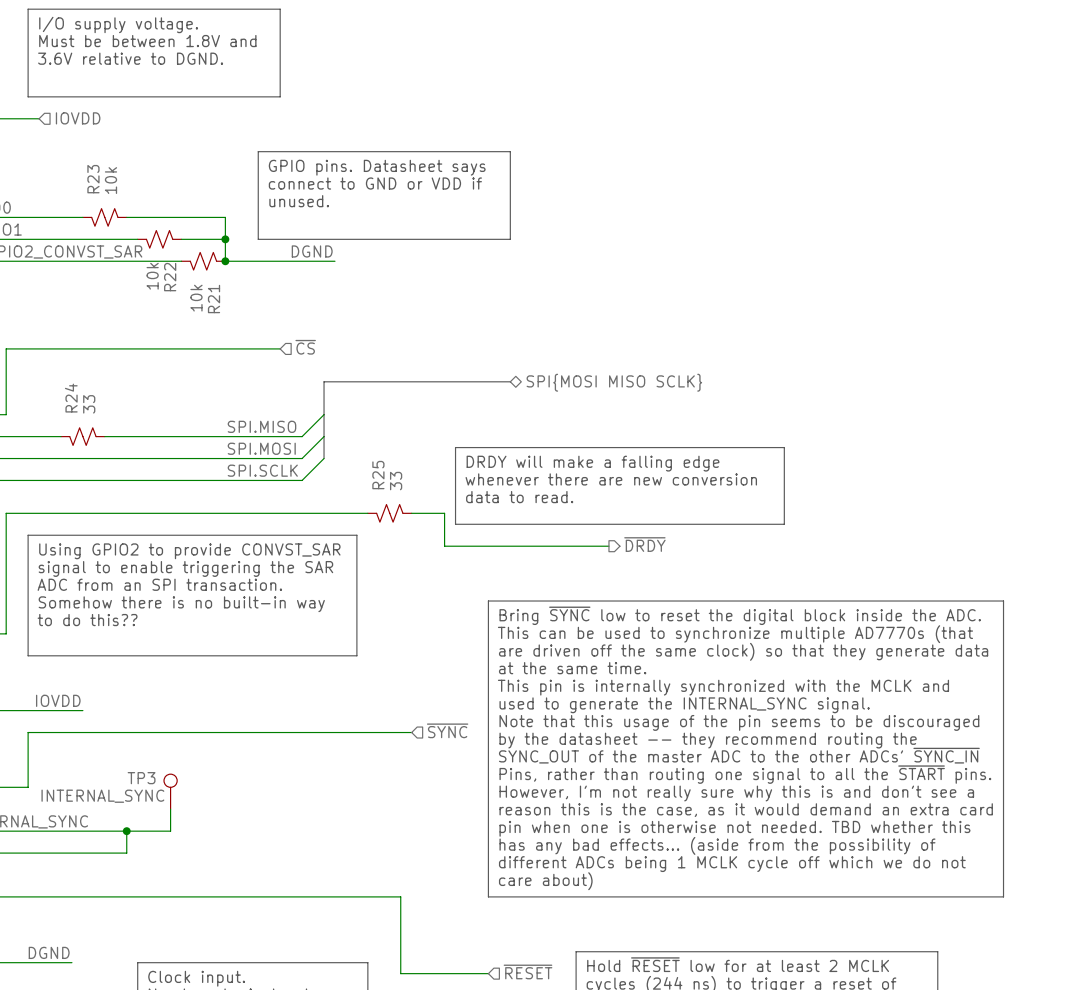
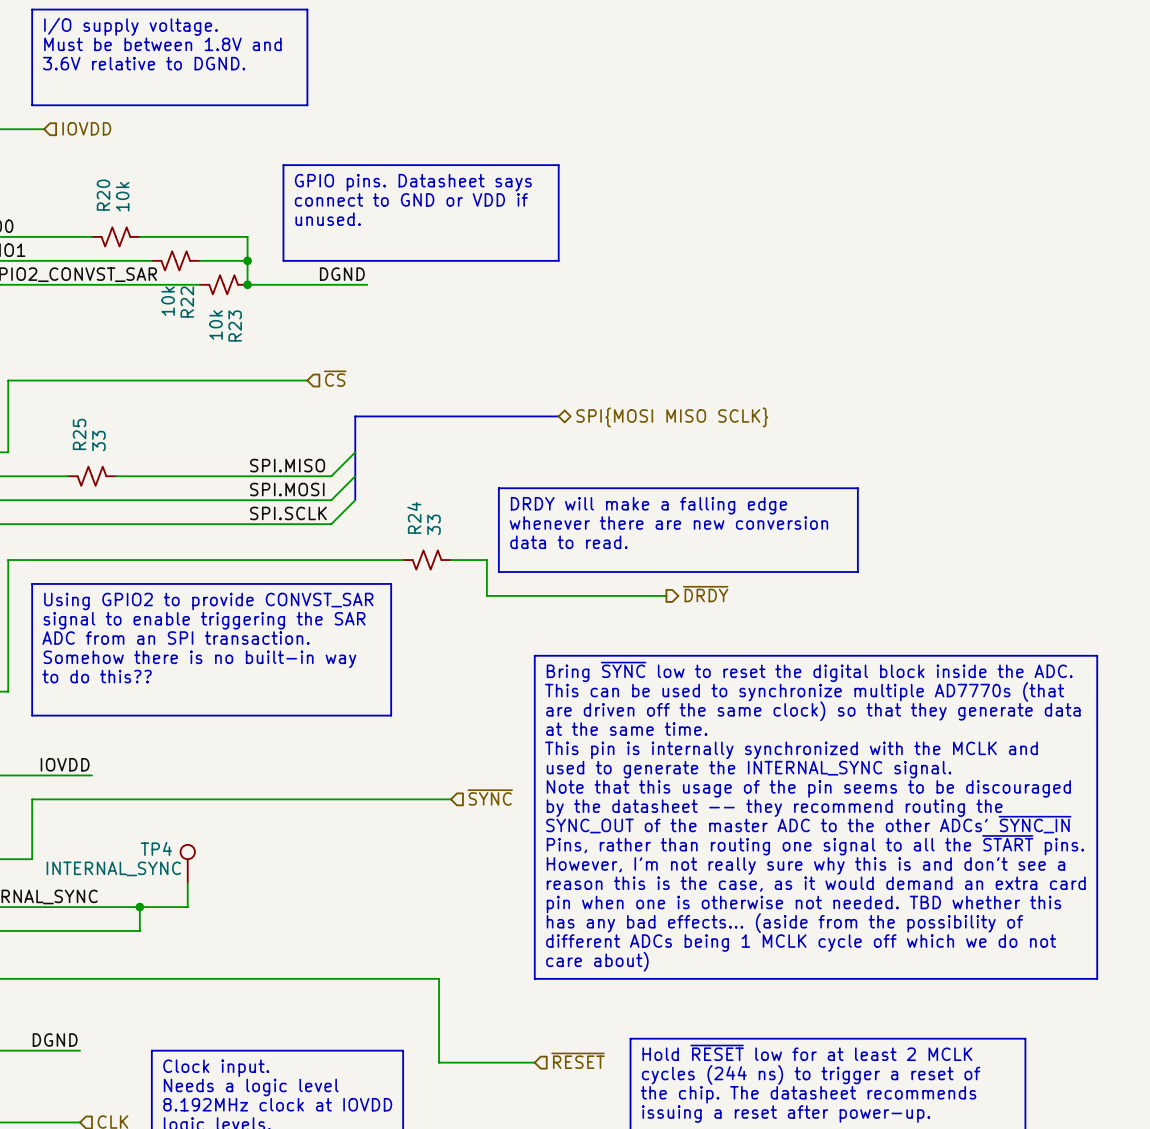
R23 name: R23 (93, 179) -> R20 (103, 195)
R21 name: R21 (214, 299) -> R23 (235, 326)
R24 name: R24 (71, 398) -> R25 (79, 434)
R25 name: R25 (378, 475) -> R24 (414, 517)
TP3 name: TP3 (141, 778) -> TP4 (156, 848)

